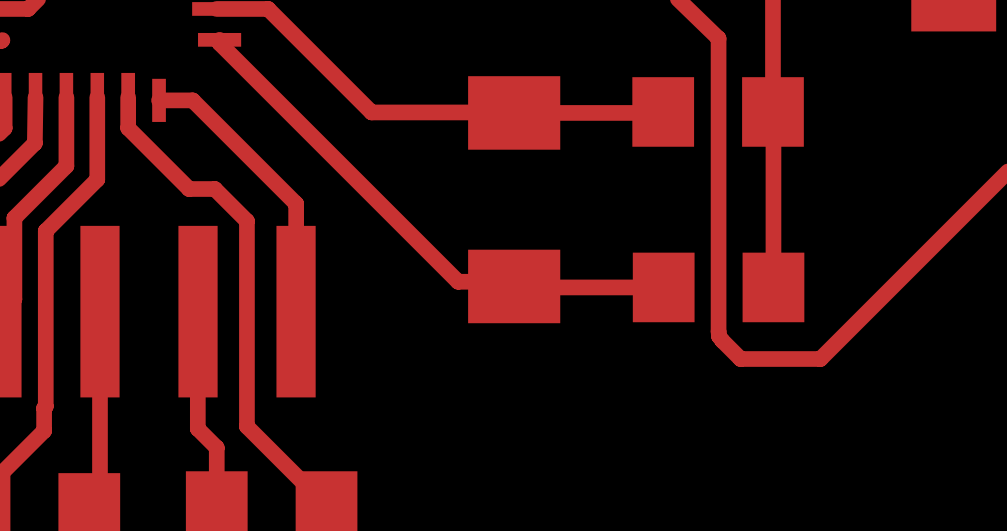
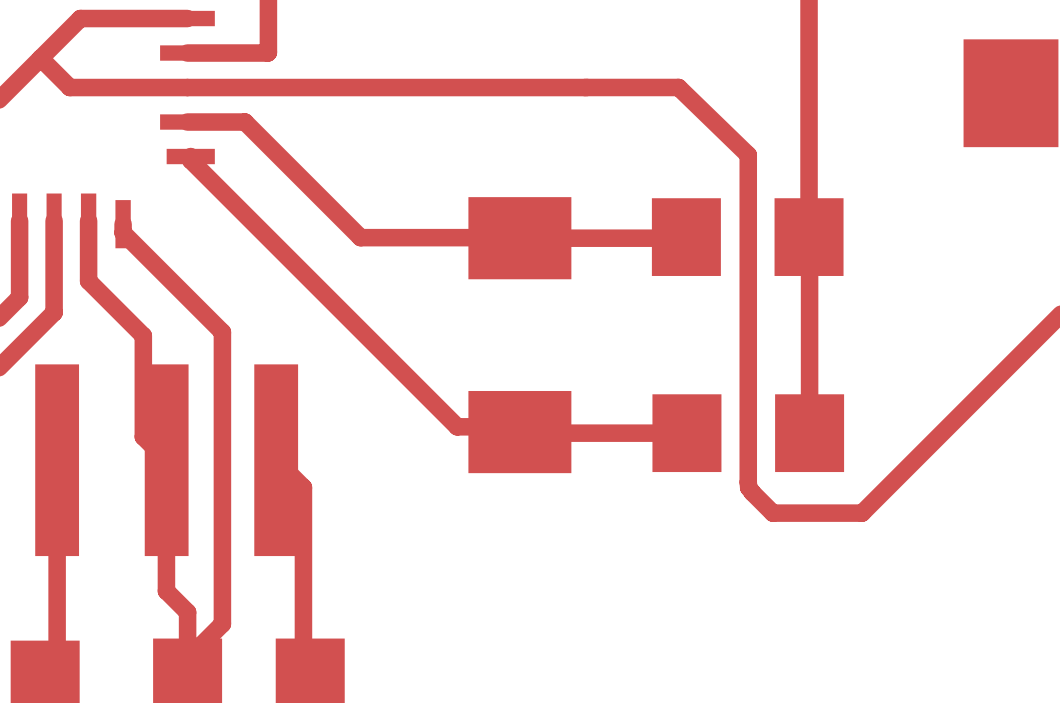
top track: (159, 100) (192, 100) (296, 203) (296, 311) -> (123, 224) (123, 232) (222, 332) (222, 623) (180, 665)
top track: (128, 128) (189, 189) (214, 189) (246, 221) (246, 426) (326, 506) -> (88, 255) (88, 281) (143, 335) (143, 436) (166, 460)
top track: none -> (276, 460) (303, 487) (303, 665)

